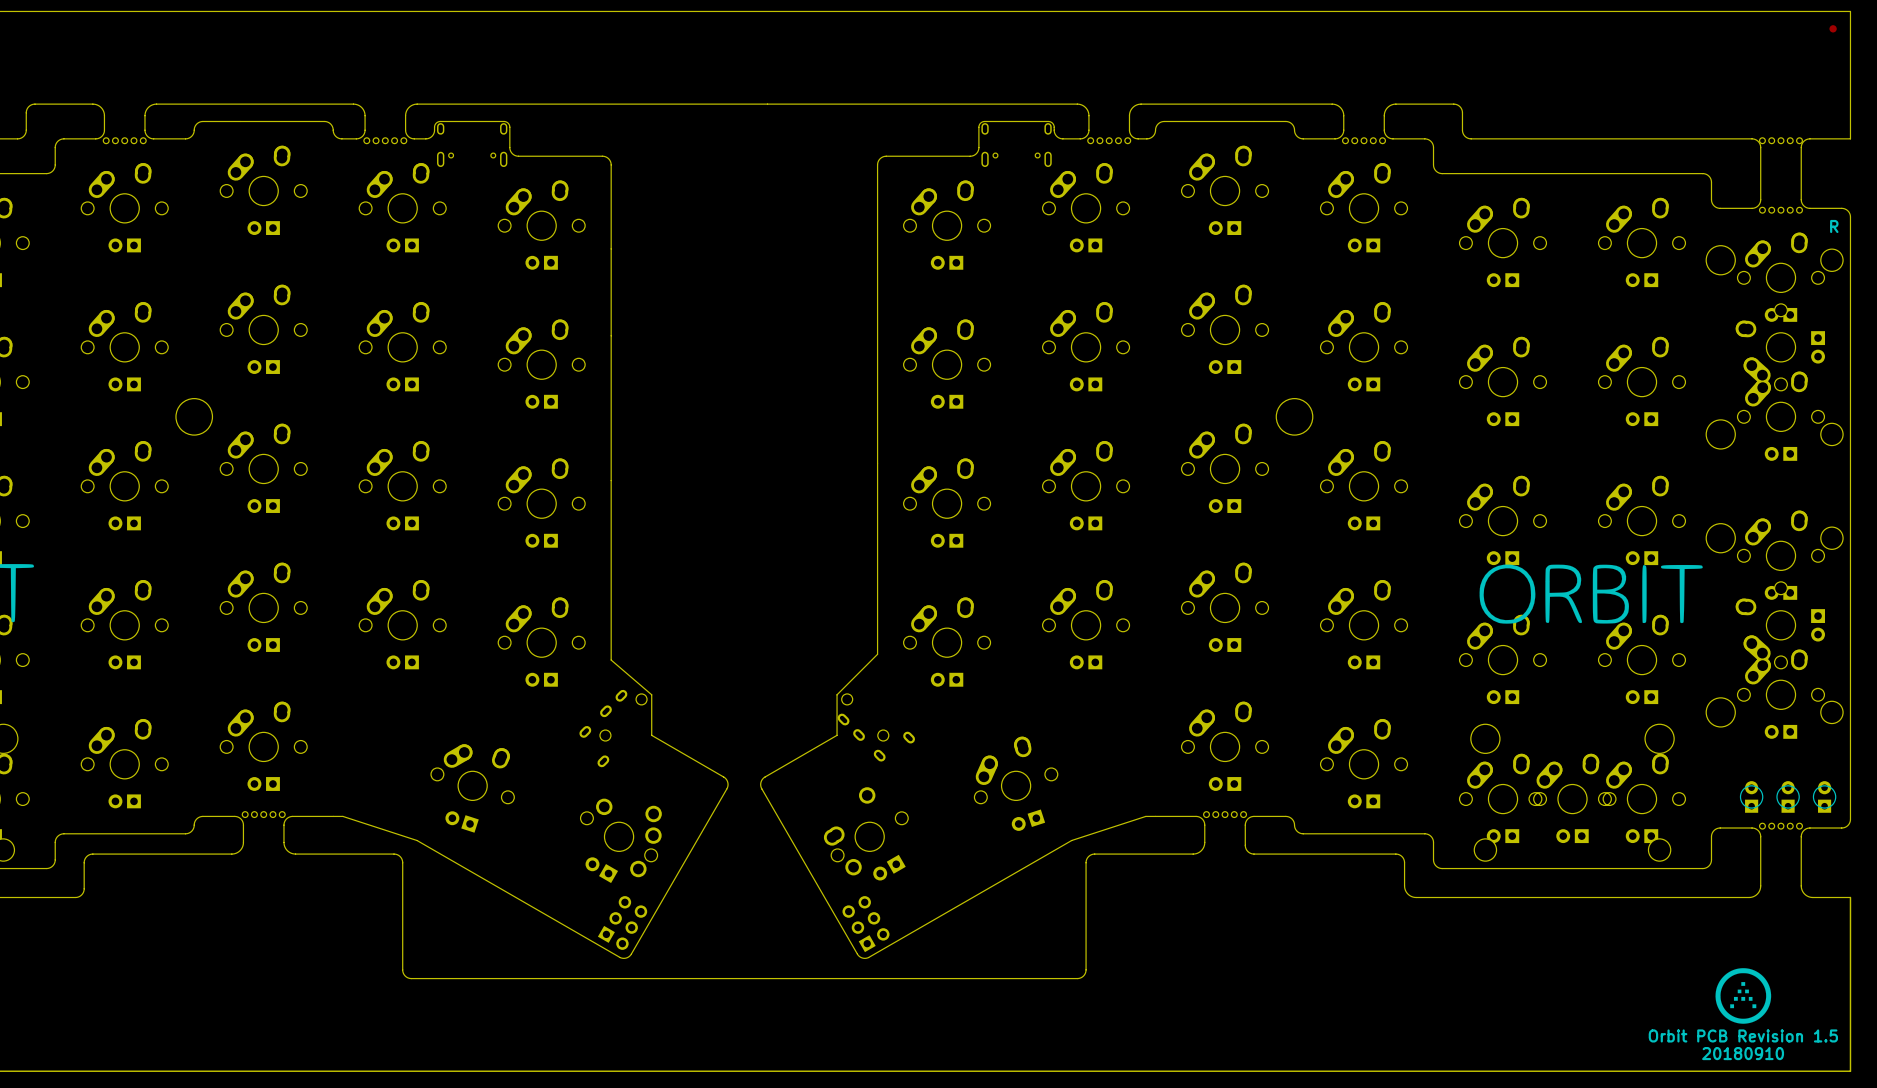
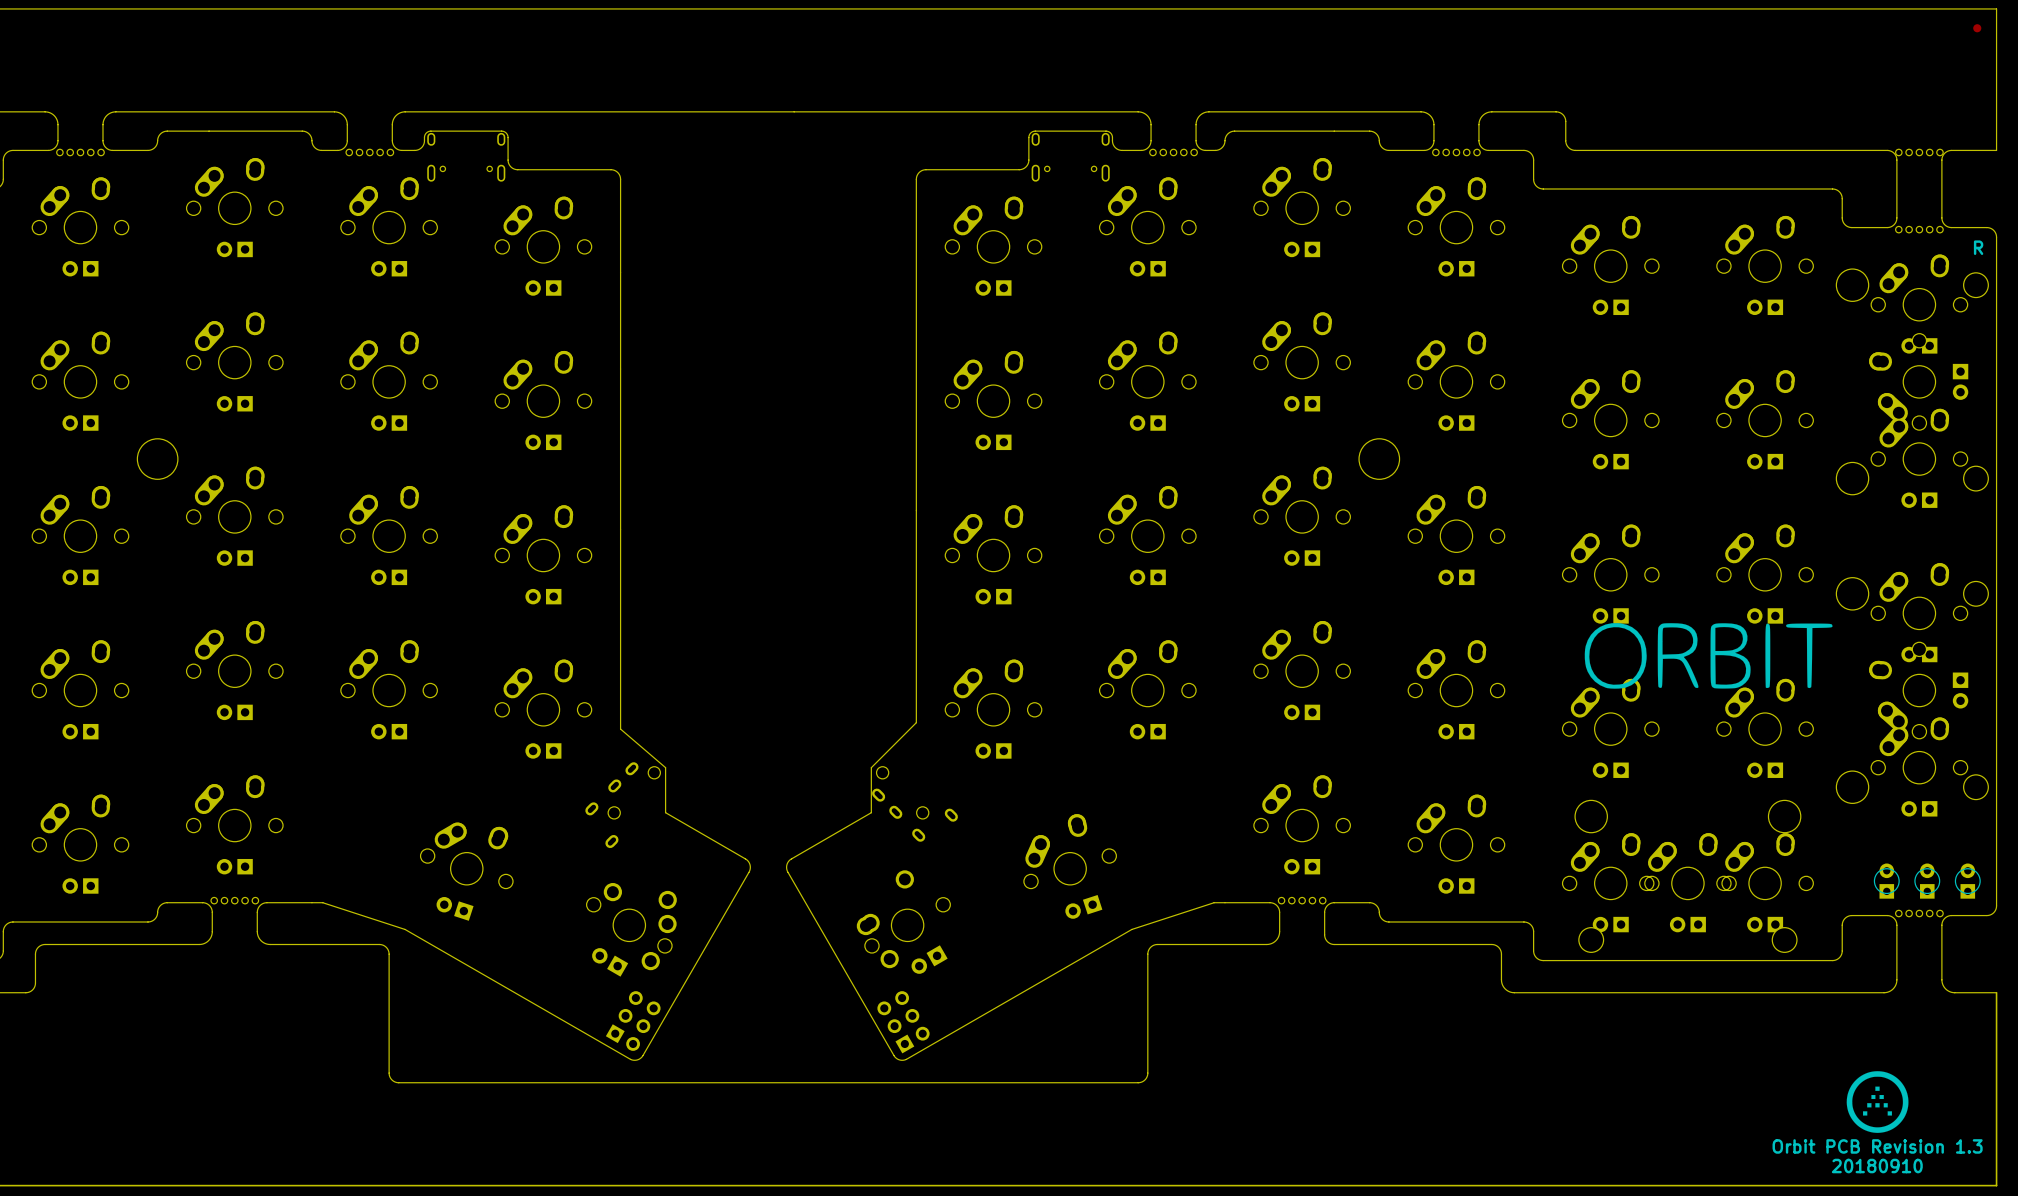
text: Orbit PCB Revision 1.5 (1743, 1035) -> Orbit PCB Revision 1.3 (1877, 1146)

